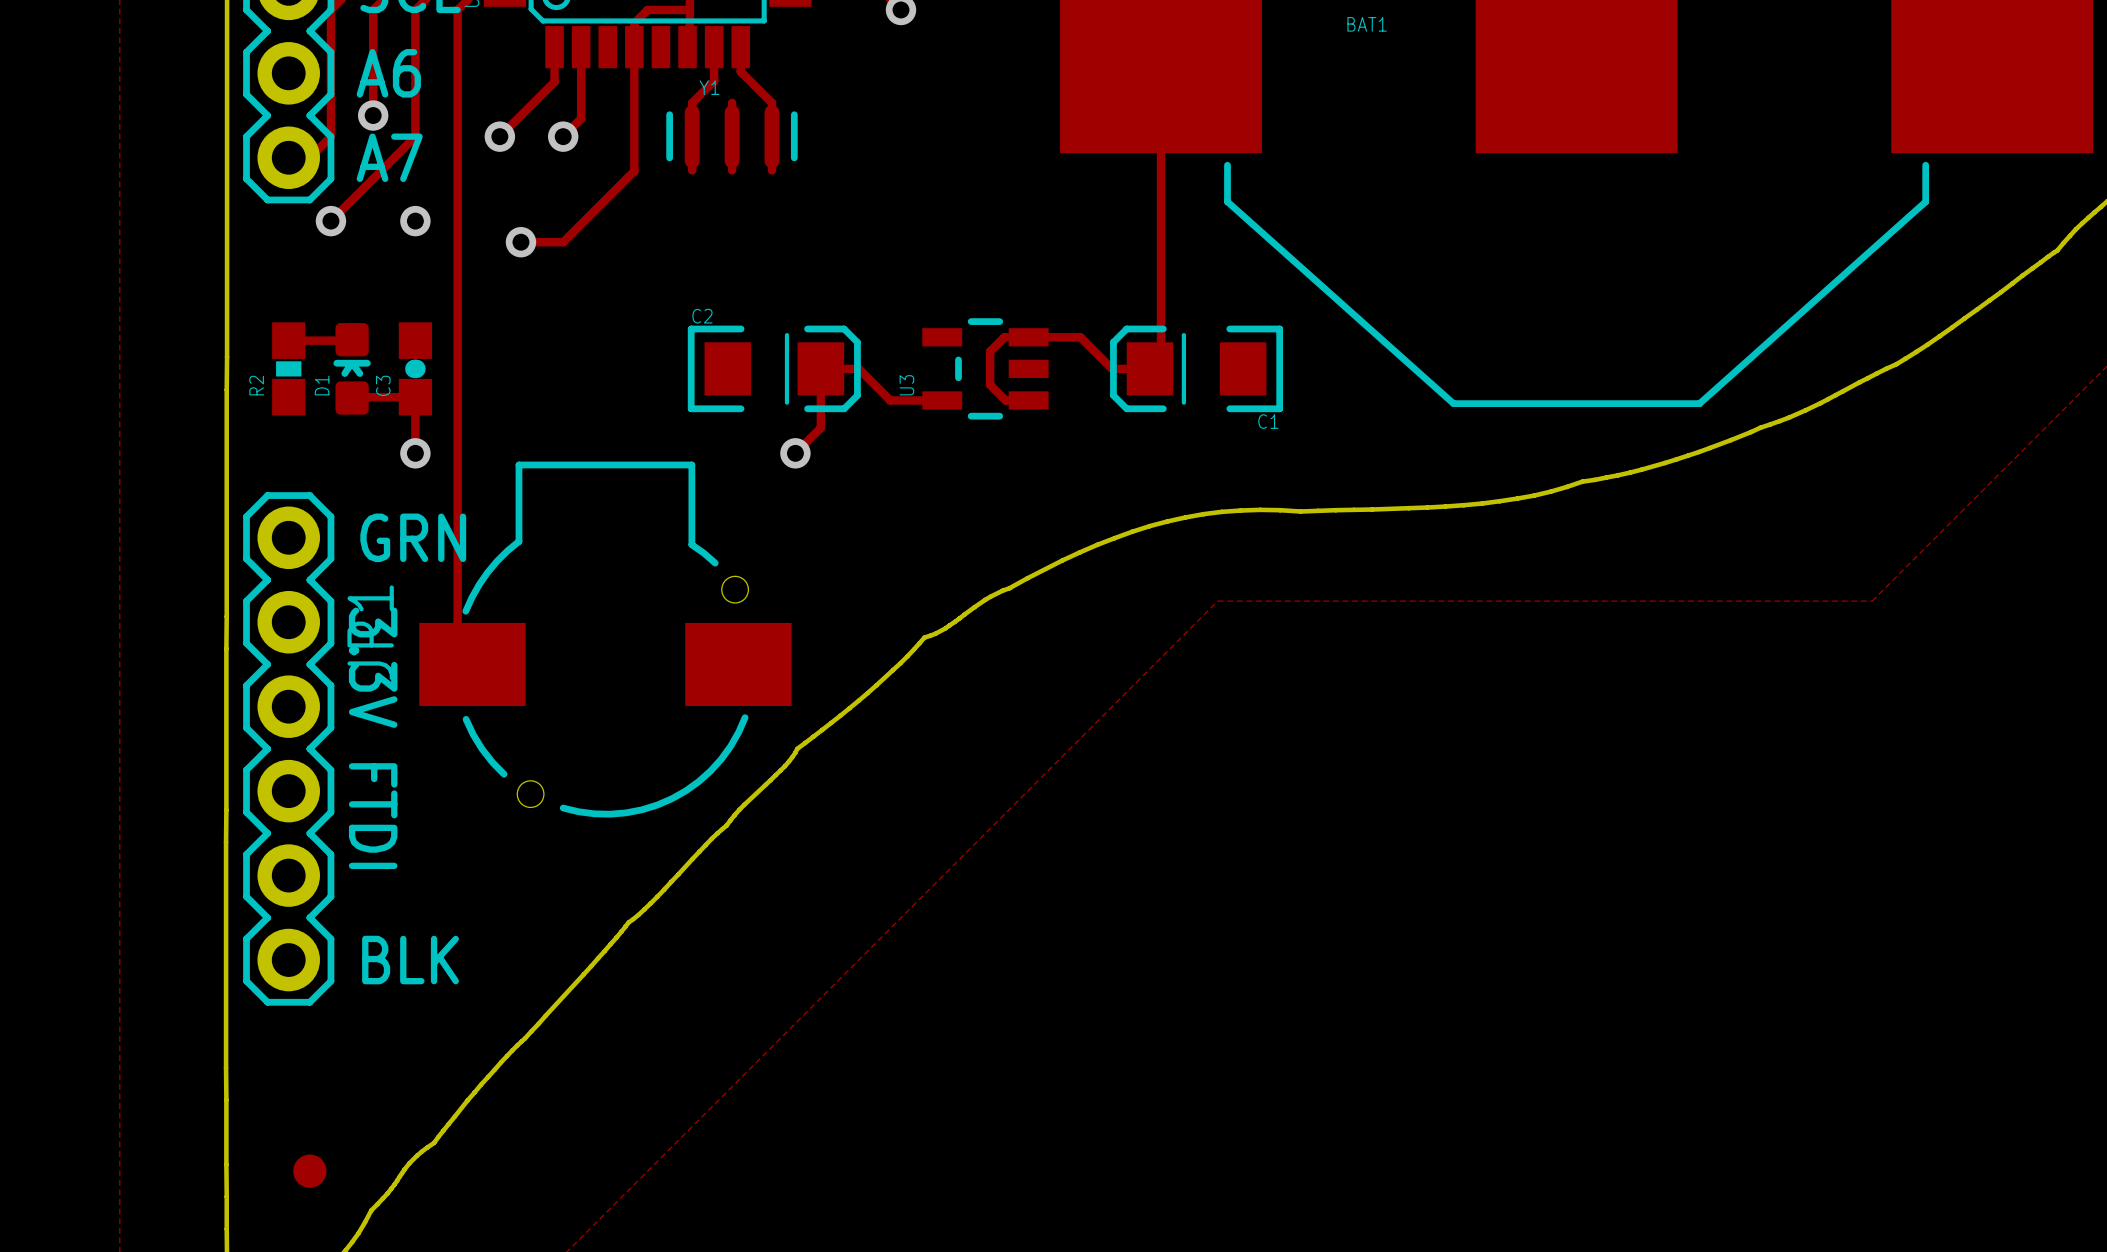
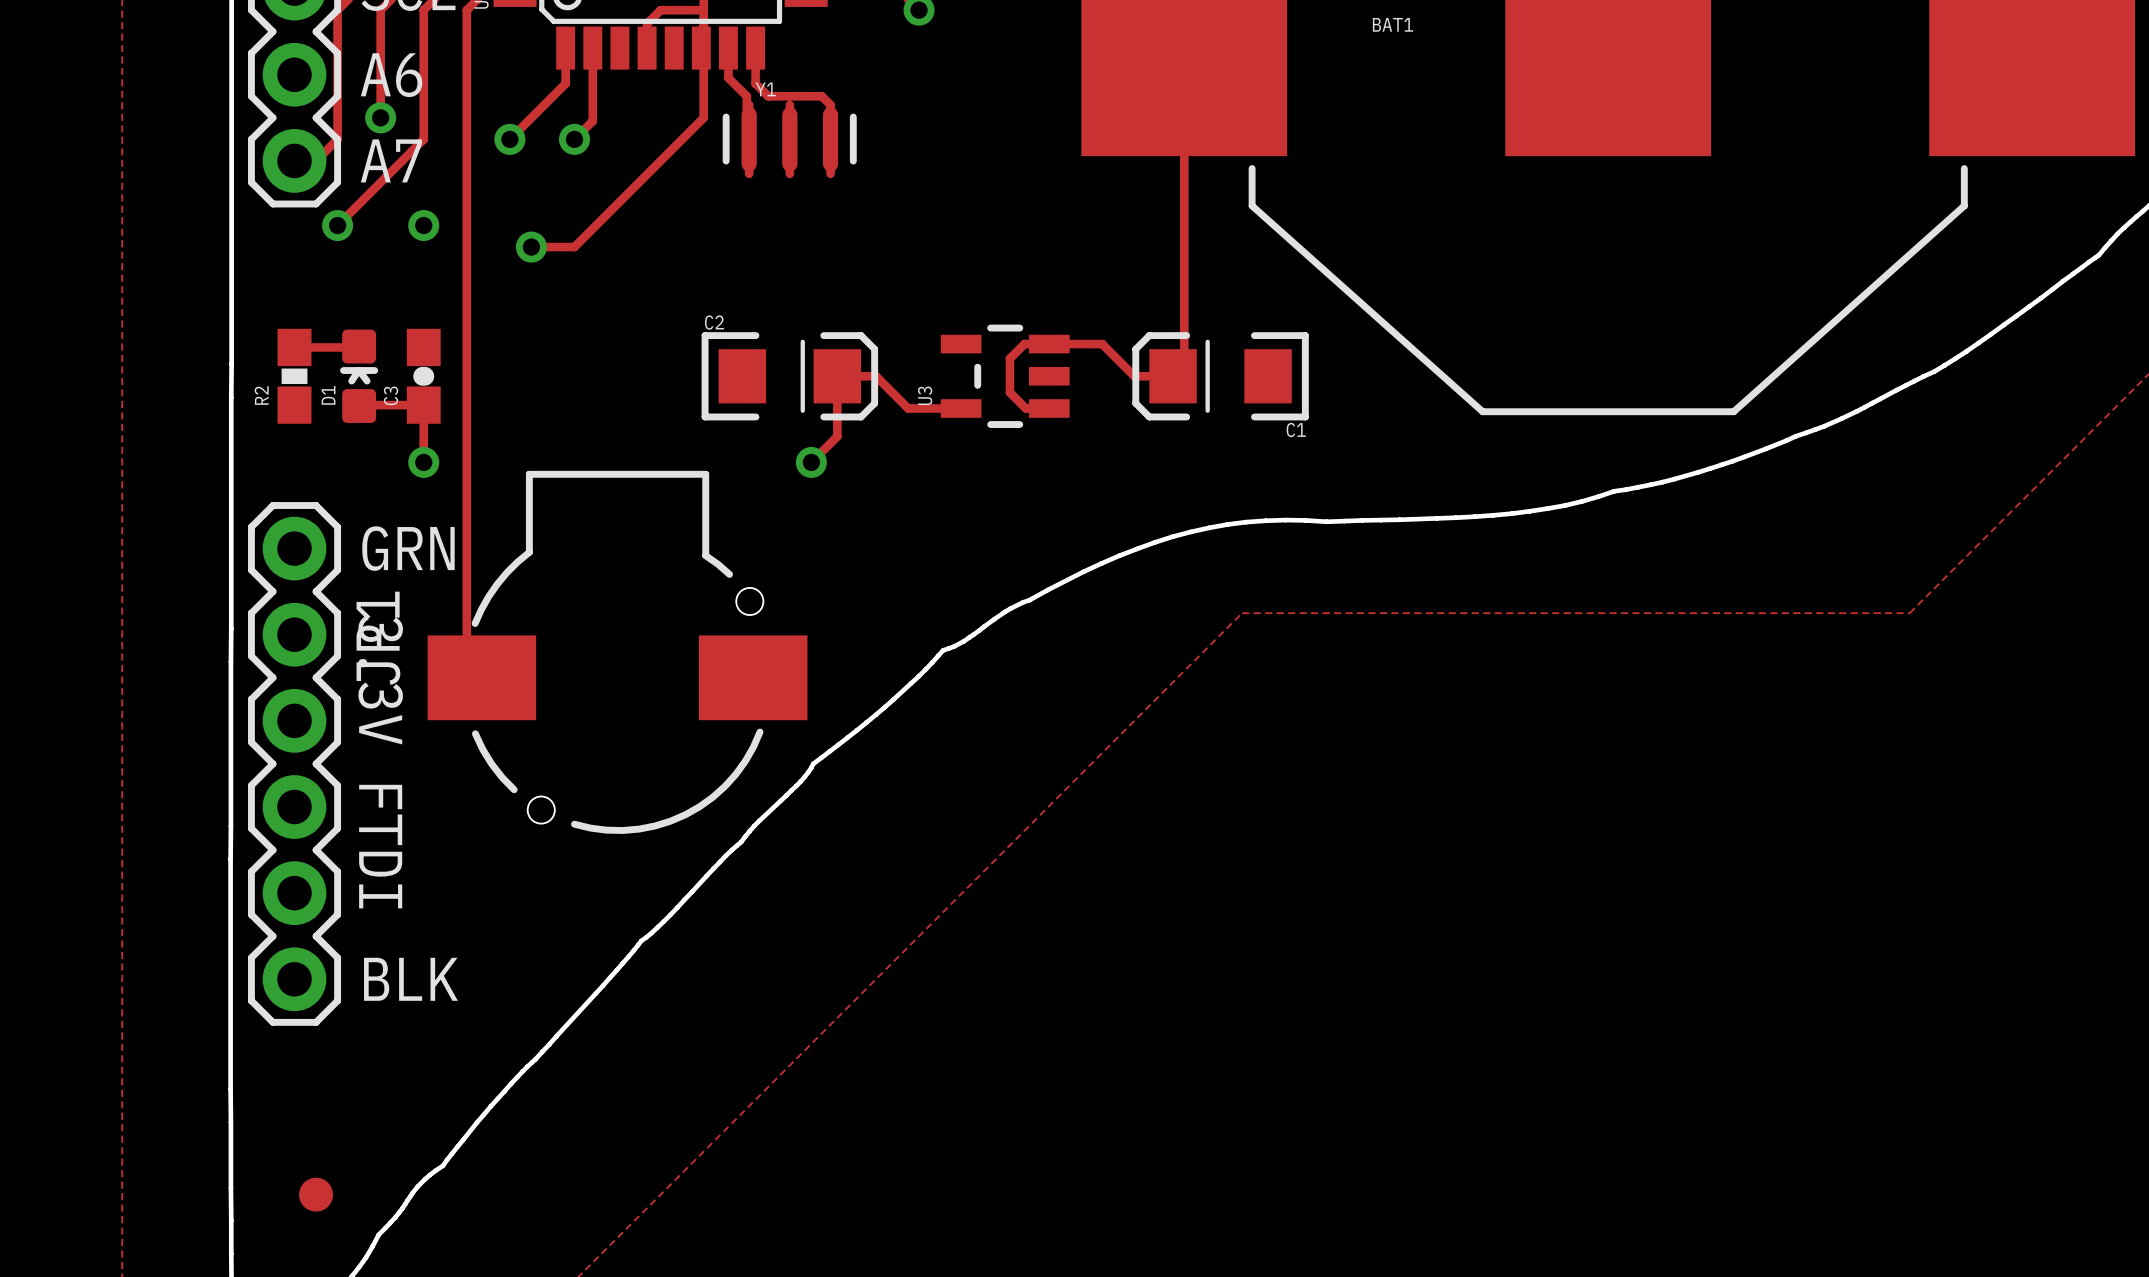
track: (634, 47) (634, 171) -> (703, 50) (703, 117) (647, 174)
track: (740, 71) (771, 102) -> (755, 73) (755, 83) (768, 96) (821, 96) (830, 104)
track: (714, 76) (714, 80) (692, 102) -> (728, 78) (746, 96) (746, 137) (749, 139)
Y1 position: (731, 136) -> (789, 139)

